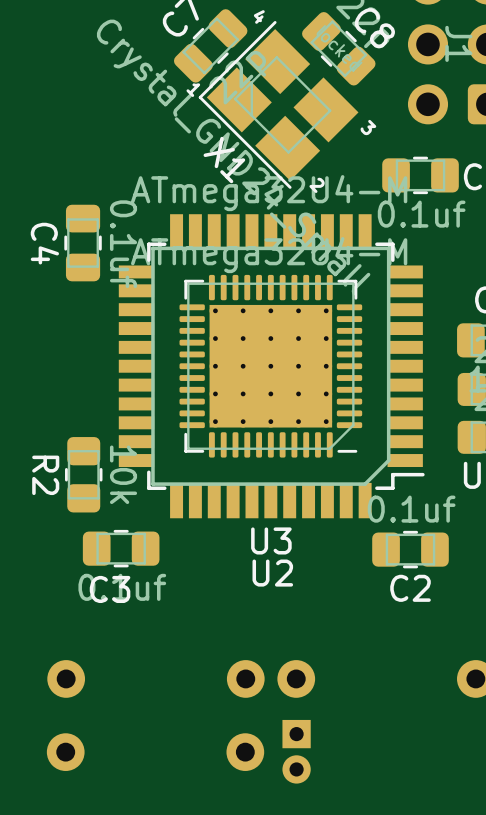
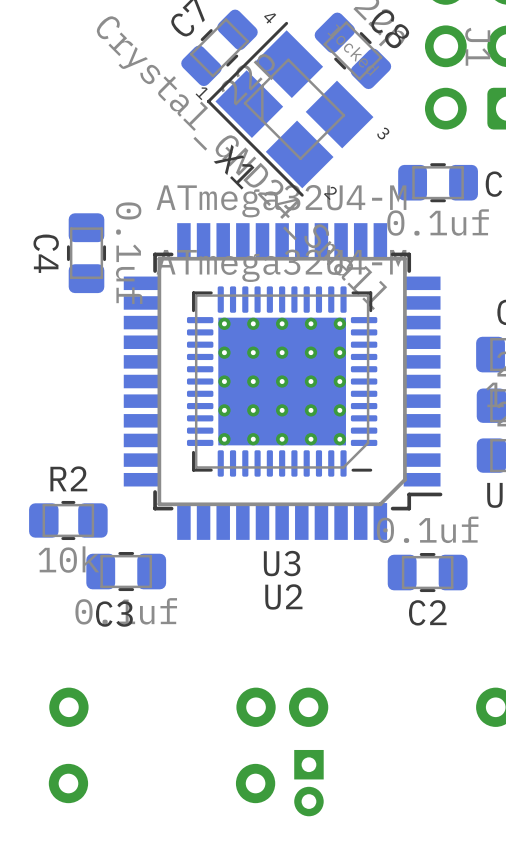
R2 rotation: 0° (83, 474) -> 90° clockwise (68, 520)

